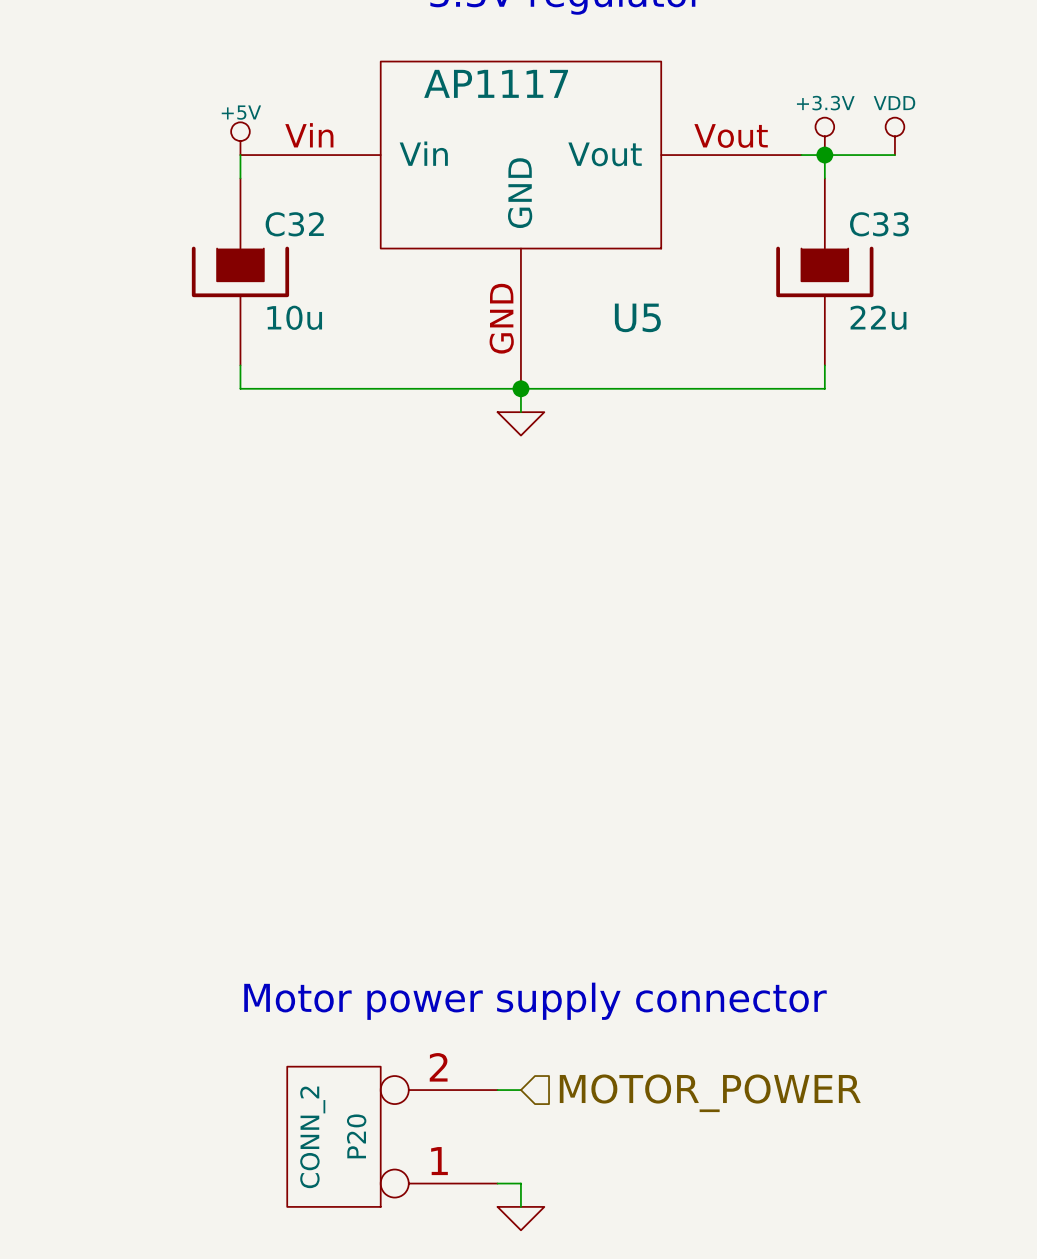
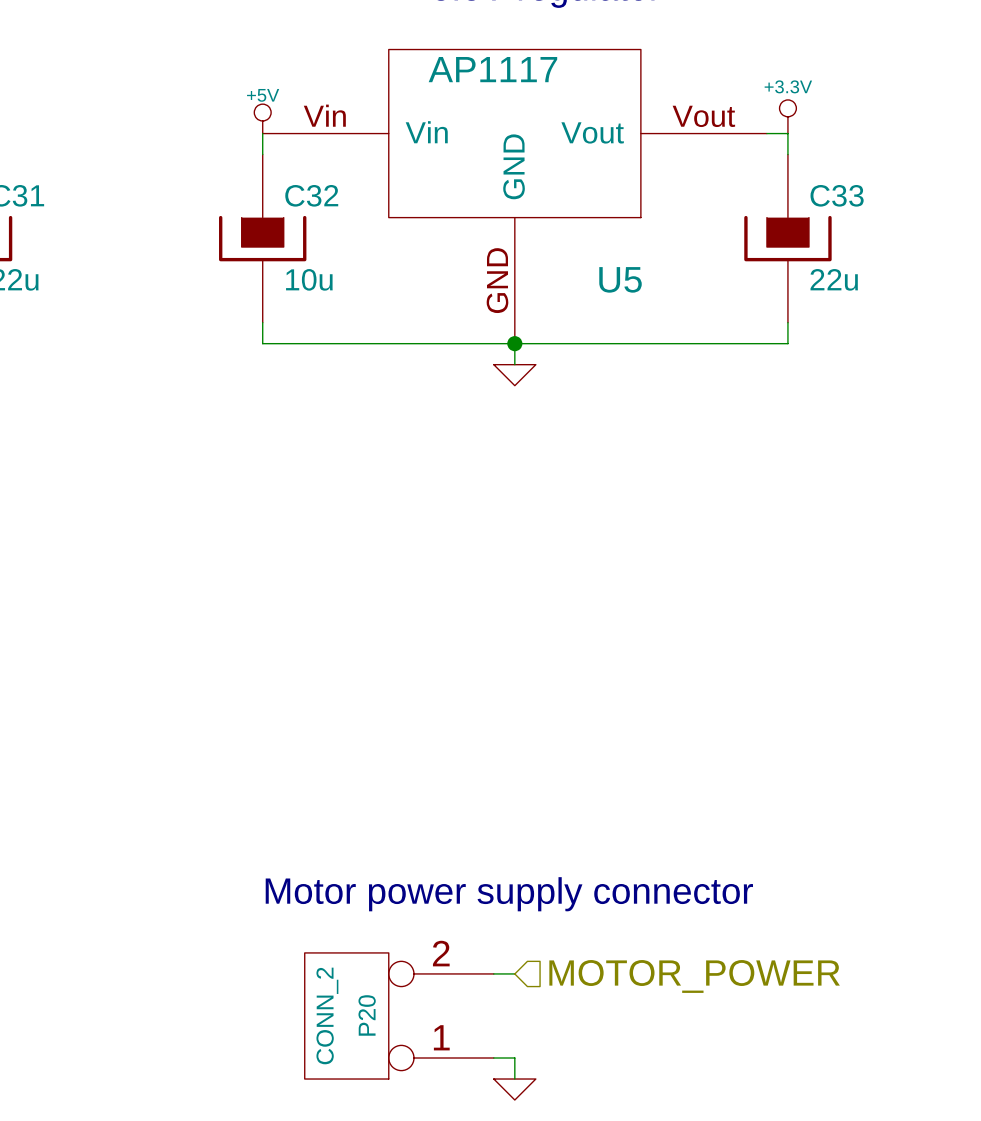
power symbol: VDD (894, 136) -> none
wire: (824, 155) (894, 155) -> none
junction: (824, 155) -> none

